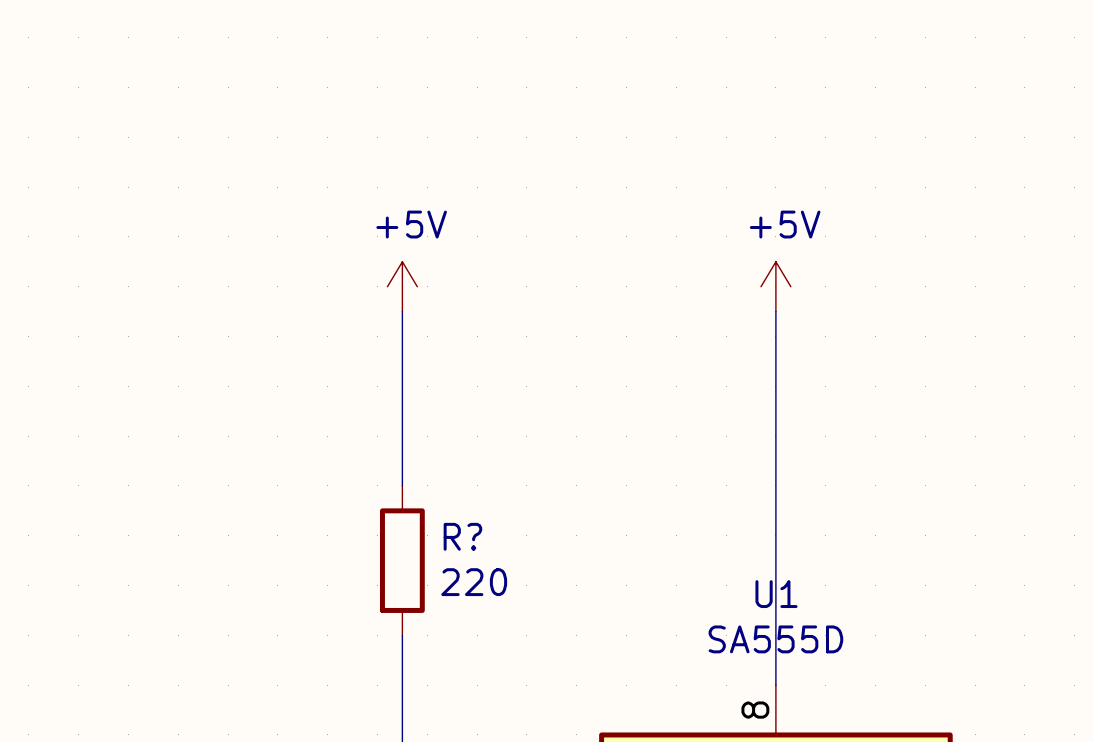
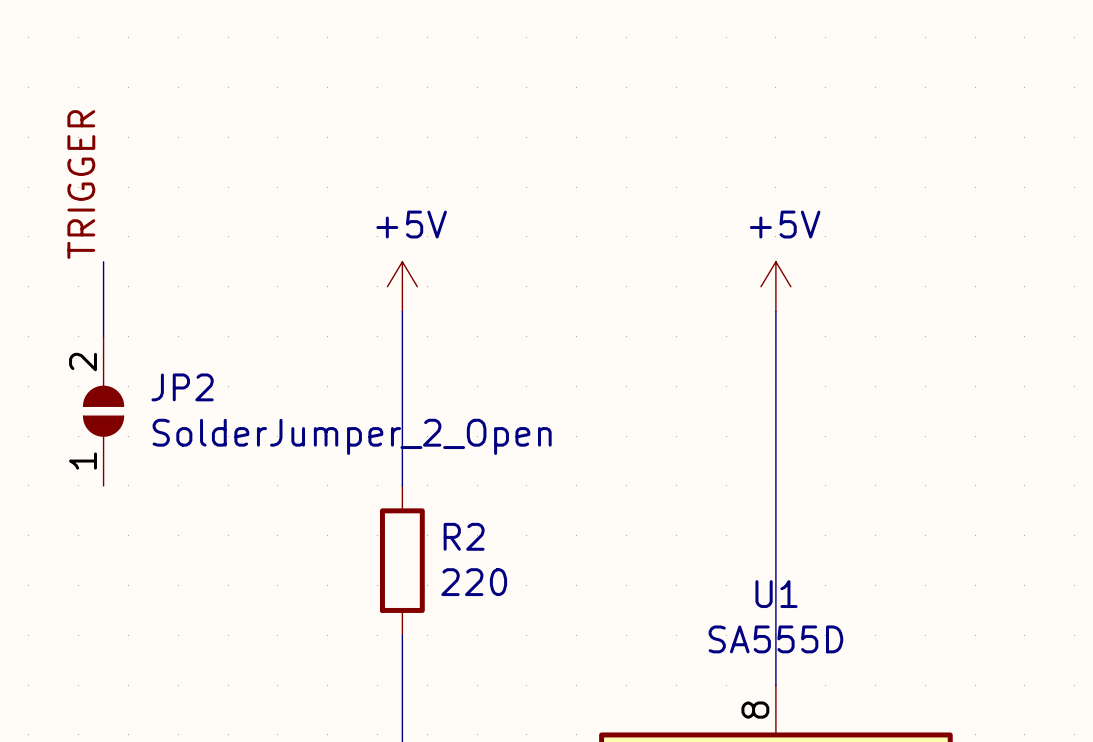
label: none -> TRIGGER (81, 184)
wire: none -> (103, 261) (103, 336)
JP2: none -> SolderJumper_2_Open (103, 411)
R? name: R? (462, 536) -> R2 (464, 536)

